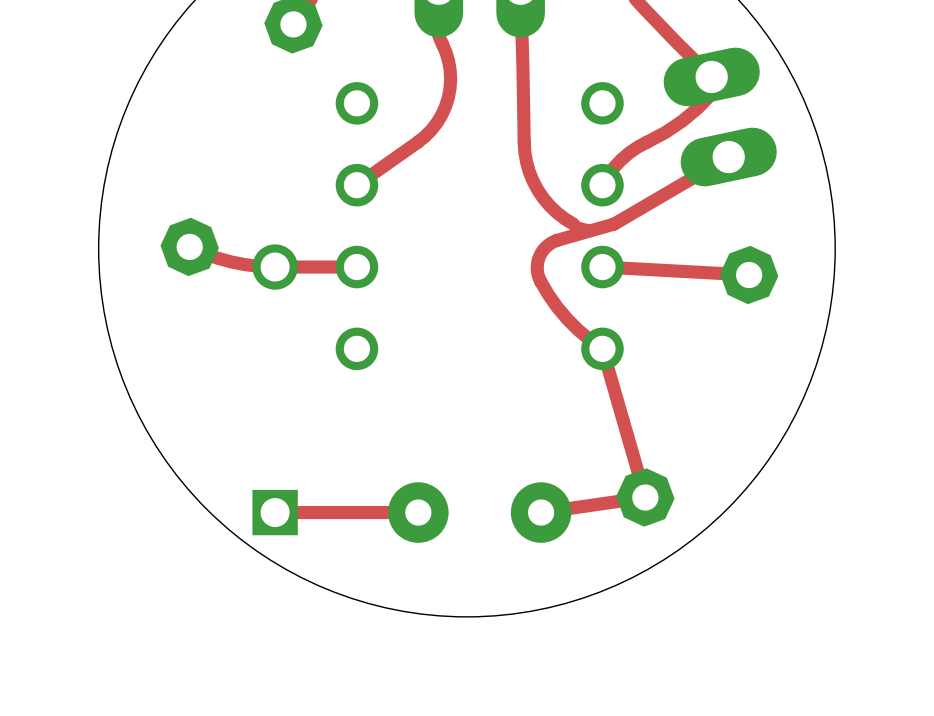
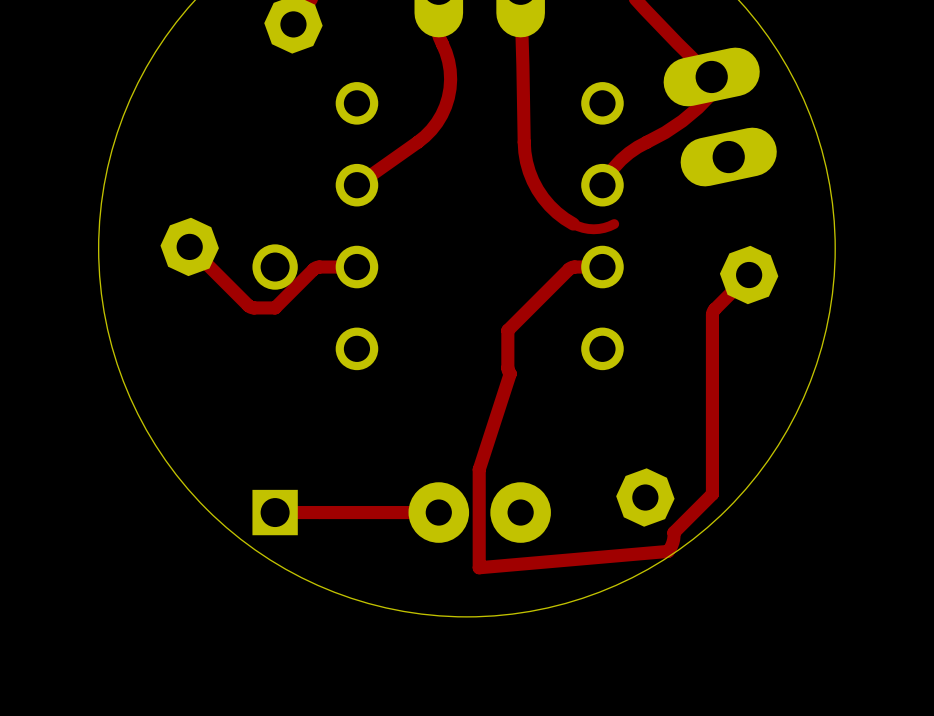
top track: (728, 157) (614, 224) (553, 241) (540, 253) (537, 263) (538, 274) (548, 294) (578, 329) (602, 348) (645, 497) (541, 512) -> none
top track: (189, 246) (217, 258) (245, 264) (319, 267) -> (189, 246) (248, 305) (253, 307) (275, 307) (313, 269) (319, 267)
top track: (602, 267) (749, 275) -> (602, 267) (569, 268) (507, 330) (507, 367) (510, 373) (479, 469) (479, 567) (668, 551) (672, 542) (673, 532) (712, 494) (712, 314) (714, 309) (749, 275)
part footprint: [388, 482, 572, 543] -> [408, 482, 551, 543]

